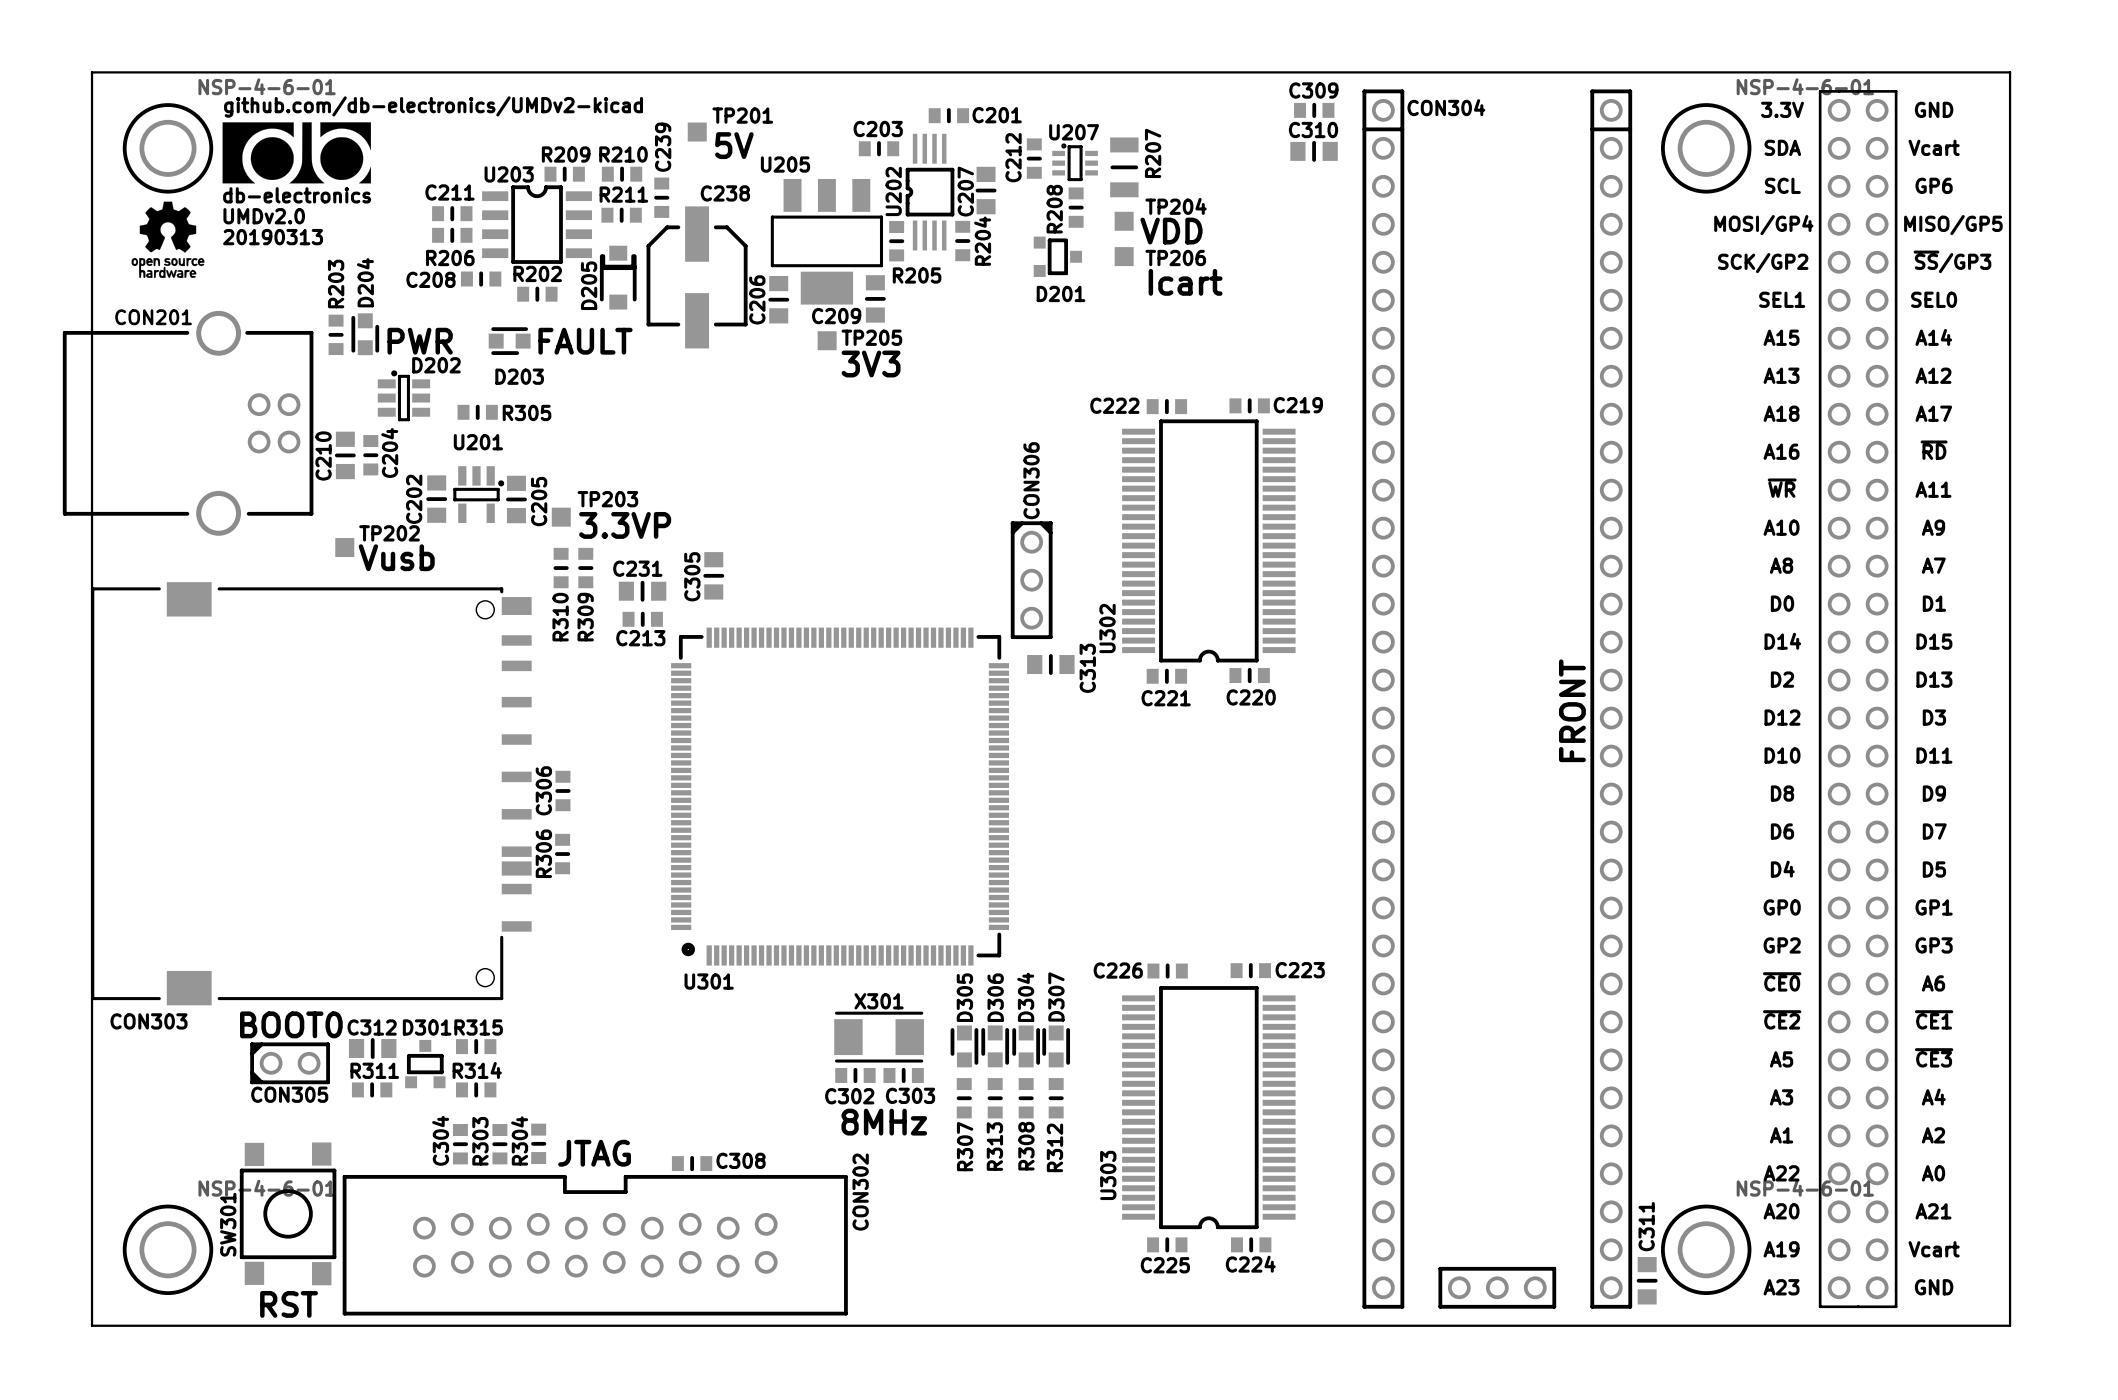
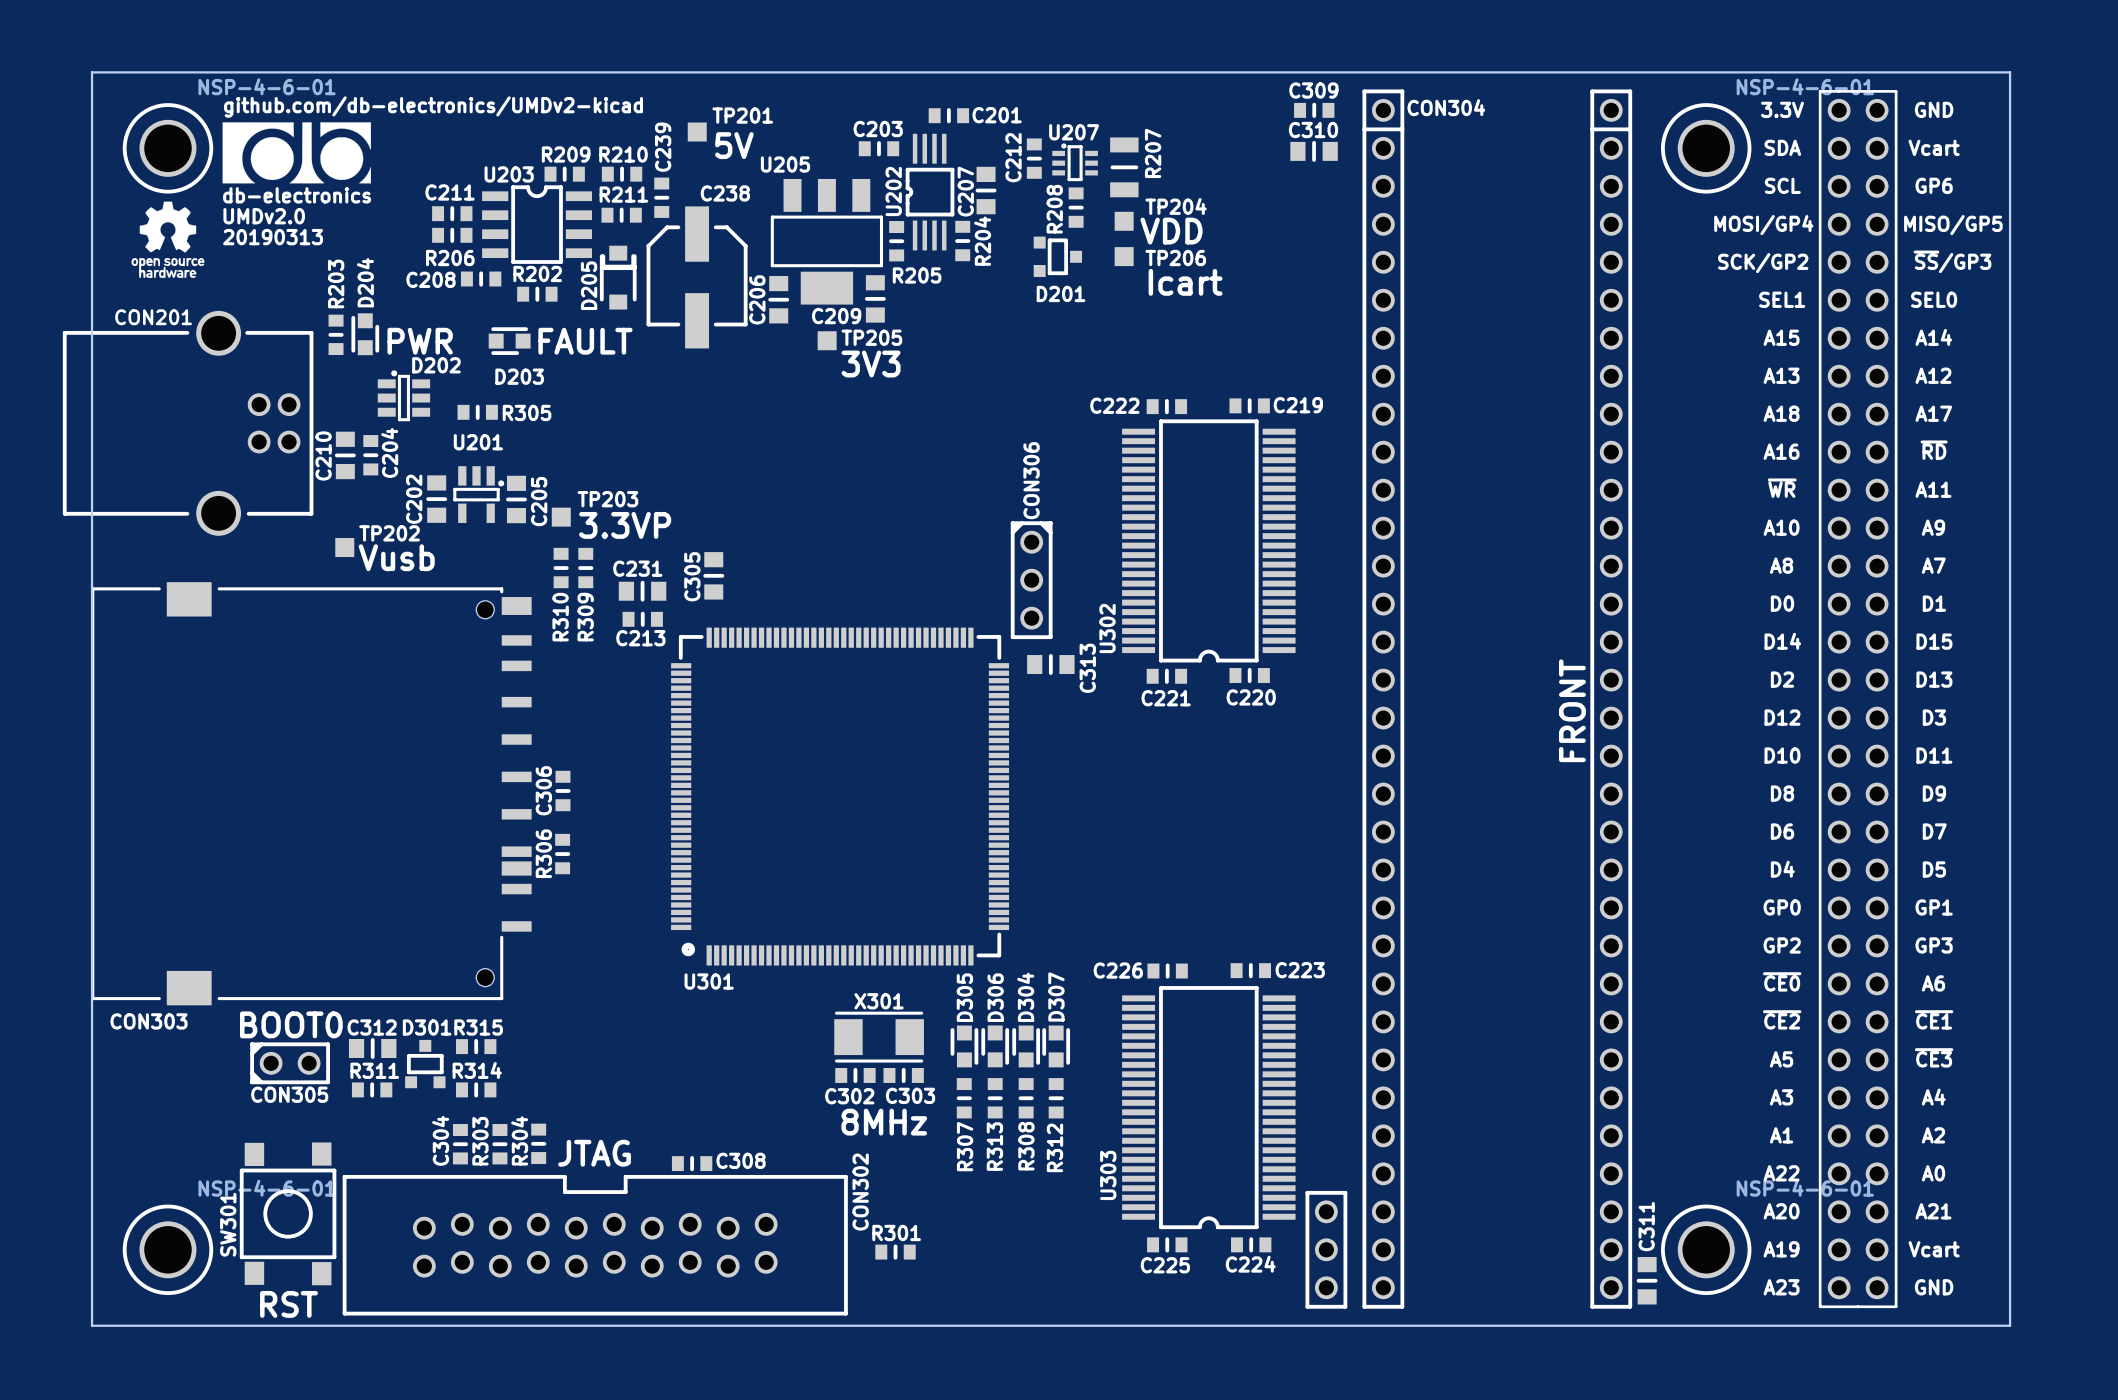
CON304 footprint: [1362, 89, 1898, 1309] -> [1305, 89, 1898, 1309]
R301: none -> (895, 1252)

